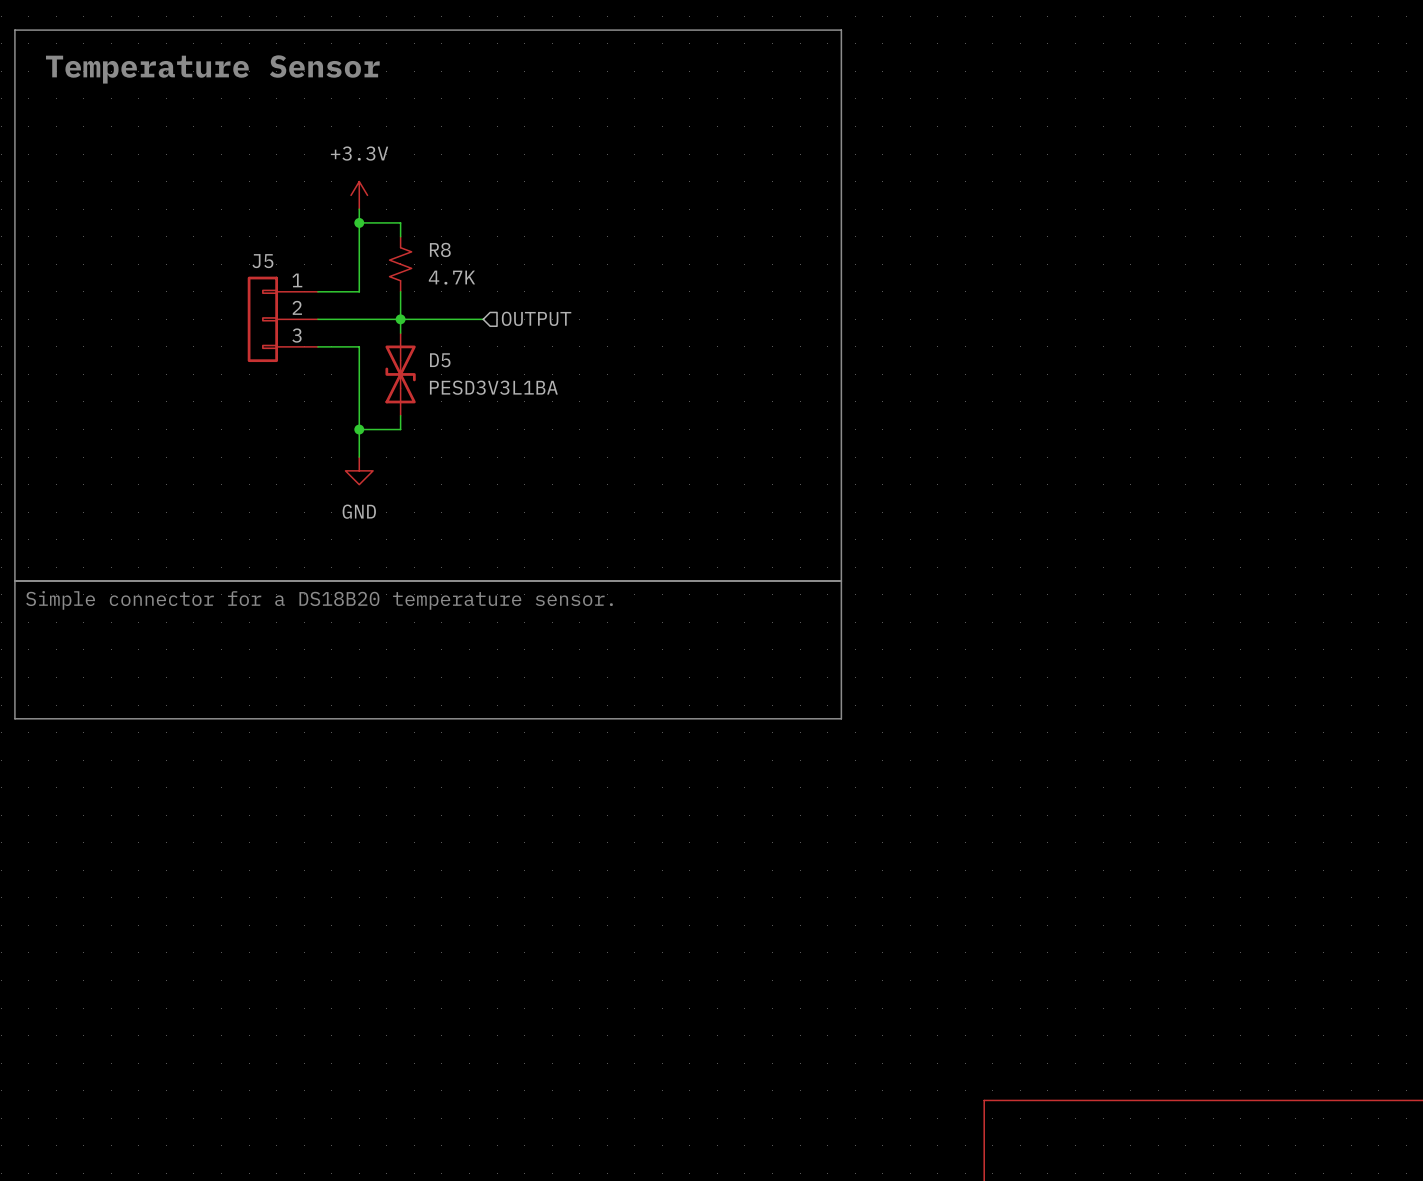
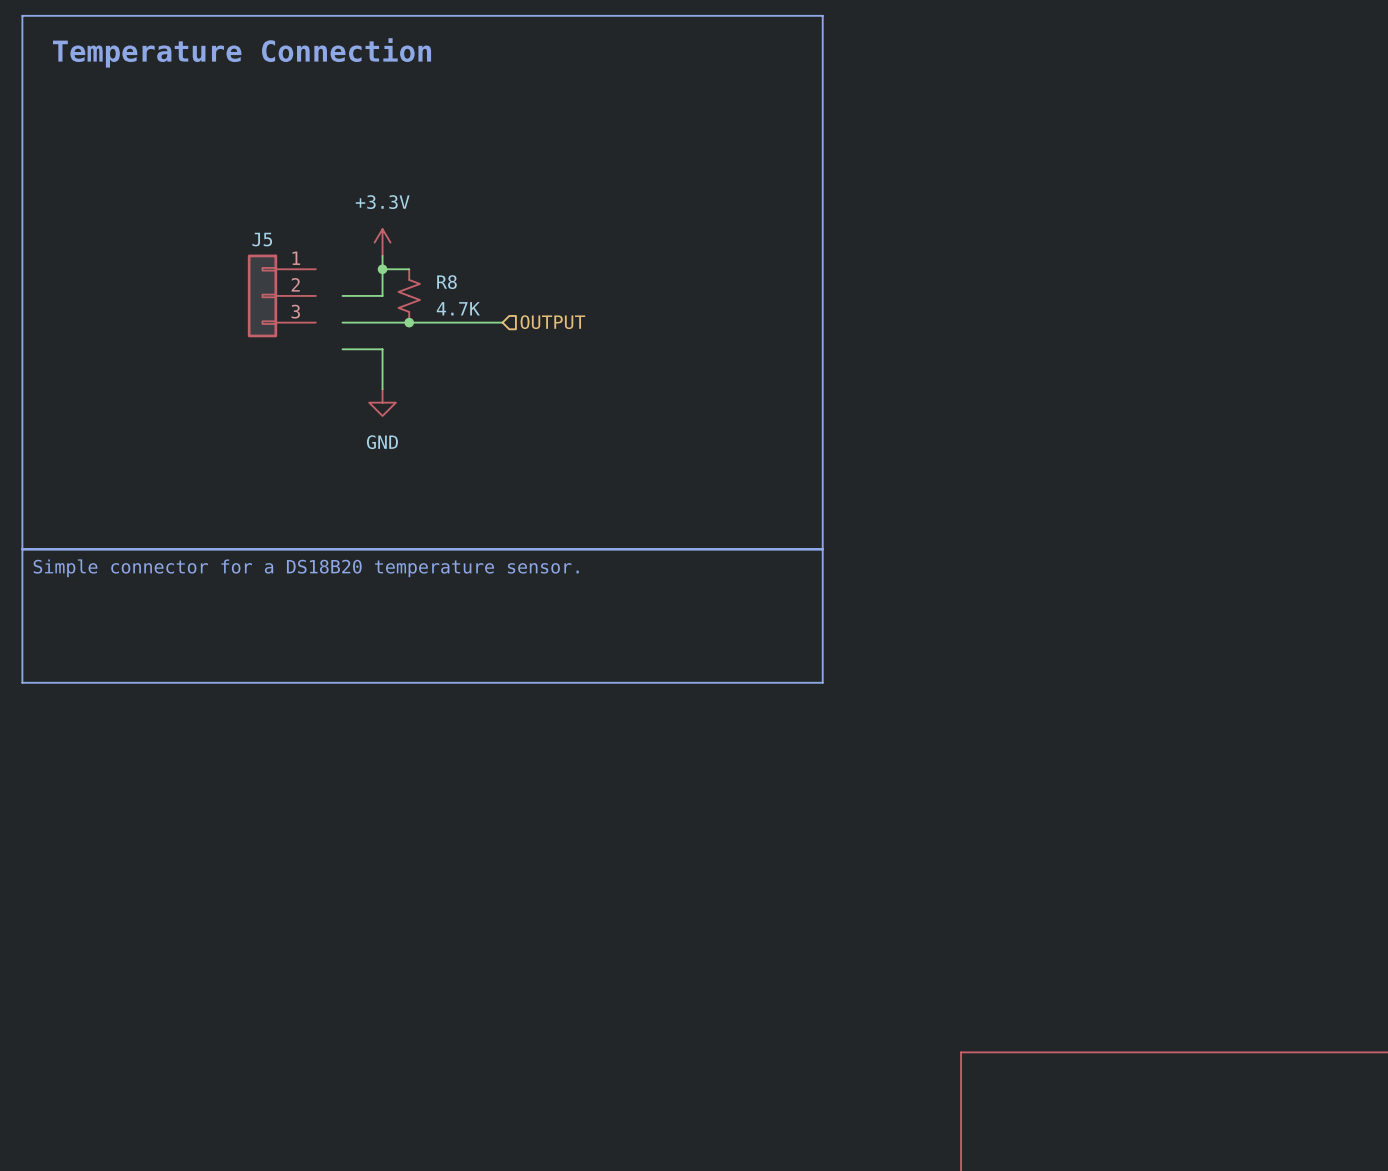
text: Temperature Sensor (212, 69) -> Temperature Connection (242, 52)
power symbol position: +3.3V (359, 195) -> +3.3V (382, 242)
wire: (359, 209) (359, 291) (317, 291) -> none
wire: (359, 222) (400, 222) (400, 236) -> none
junction: (359, 222) -> none
R8 position: (400, 264) -> (409, 295)
junction: none -> (382, 269)
wire: (400, 291) (400, 333) -> none
hierarchical label position: OUTPUT (536, 318) -> OUTPUT (552, 322)
wire: (317, 319) (345, 319) -> (382, 269) (409, 269)
wire: (386, 319) (483, 319) -> (382, 295) (382, 255)
junction: (400, 319) -> none
wire: (317, 346) (345, 346) -> none
wire: (359, 346) (359, 457) -> (355, 322) (502, 322)
junction: none -> (409, 322)
wire: none -> (342, 349) (382, 349) (382, 389)
D5: PESD3V3L1BA (400, 374) -> none
wire: (400, 415) (400, 429) (359, 429) -> none
junction: (359, 429) -> none
power symbol position: GND (359, 470) -> GND (382, 402)

